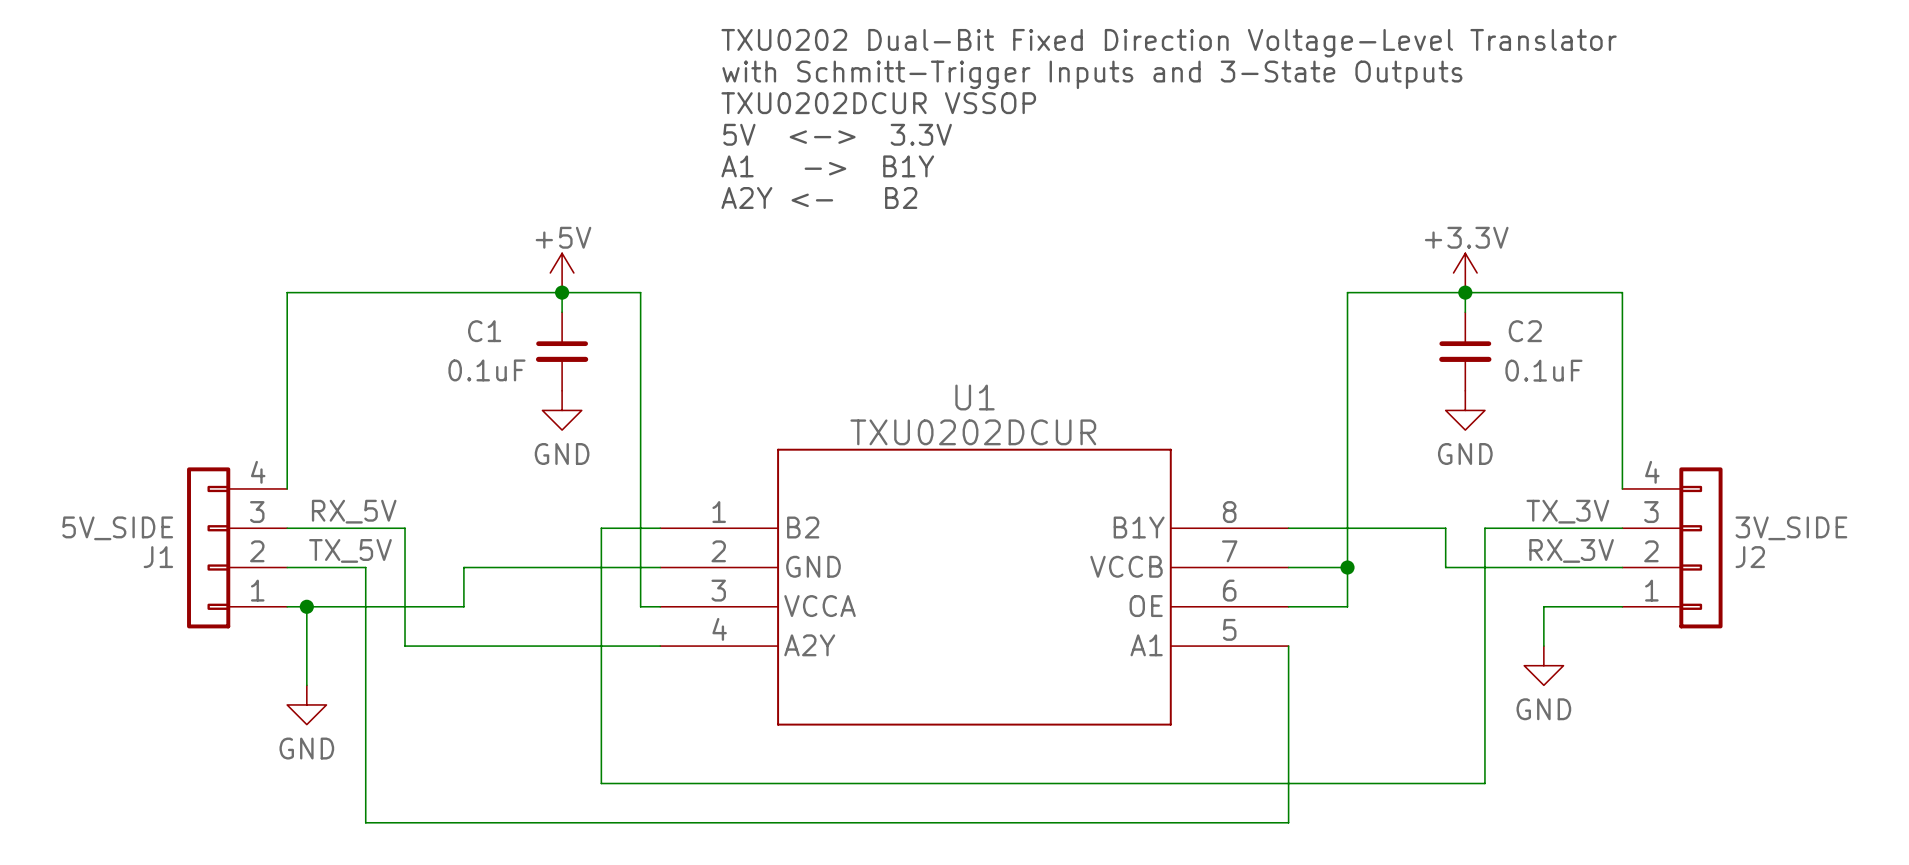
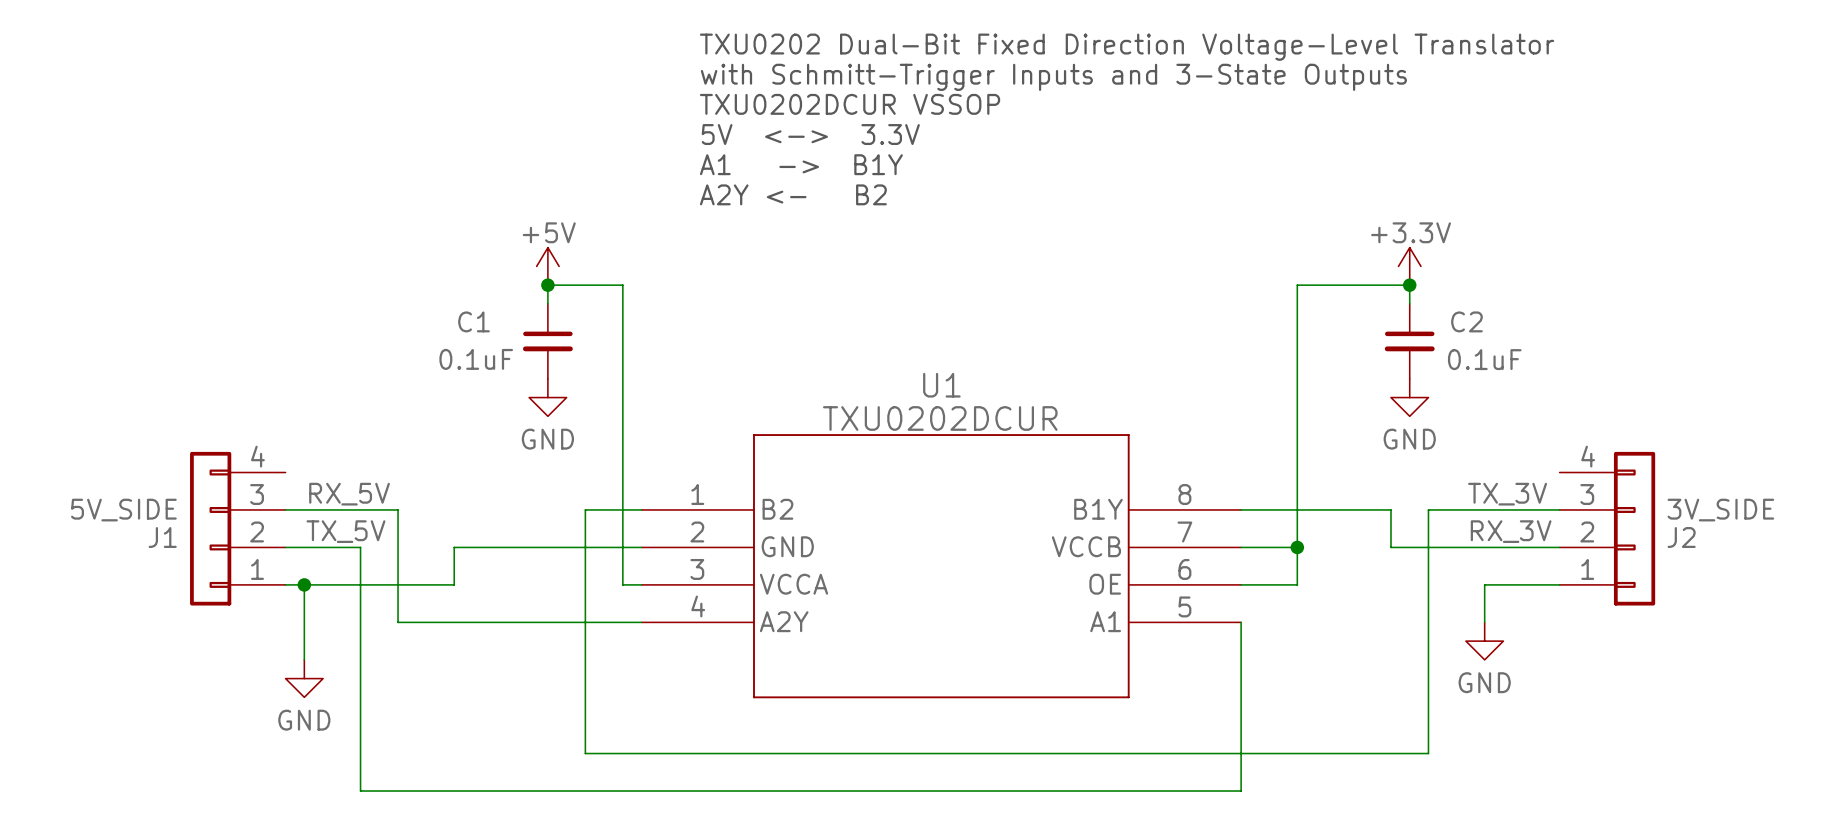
wire: (562, 292) (287, 292) (287, 488) -> none
wire: (1465, 292) (1622, 292) (1622, 488) -> none

